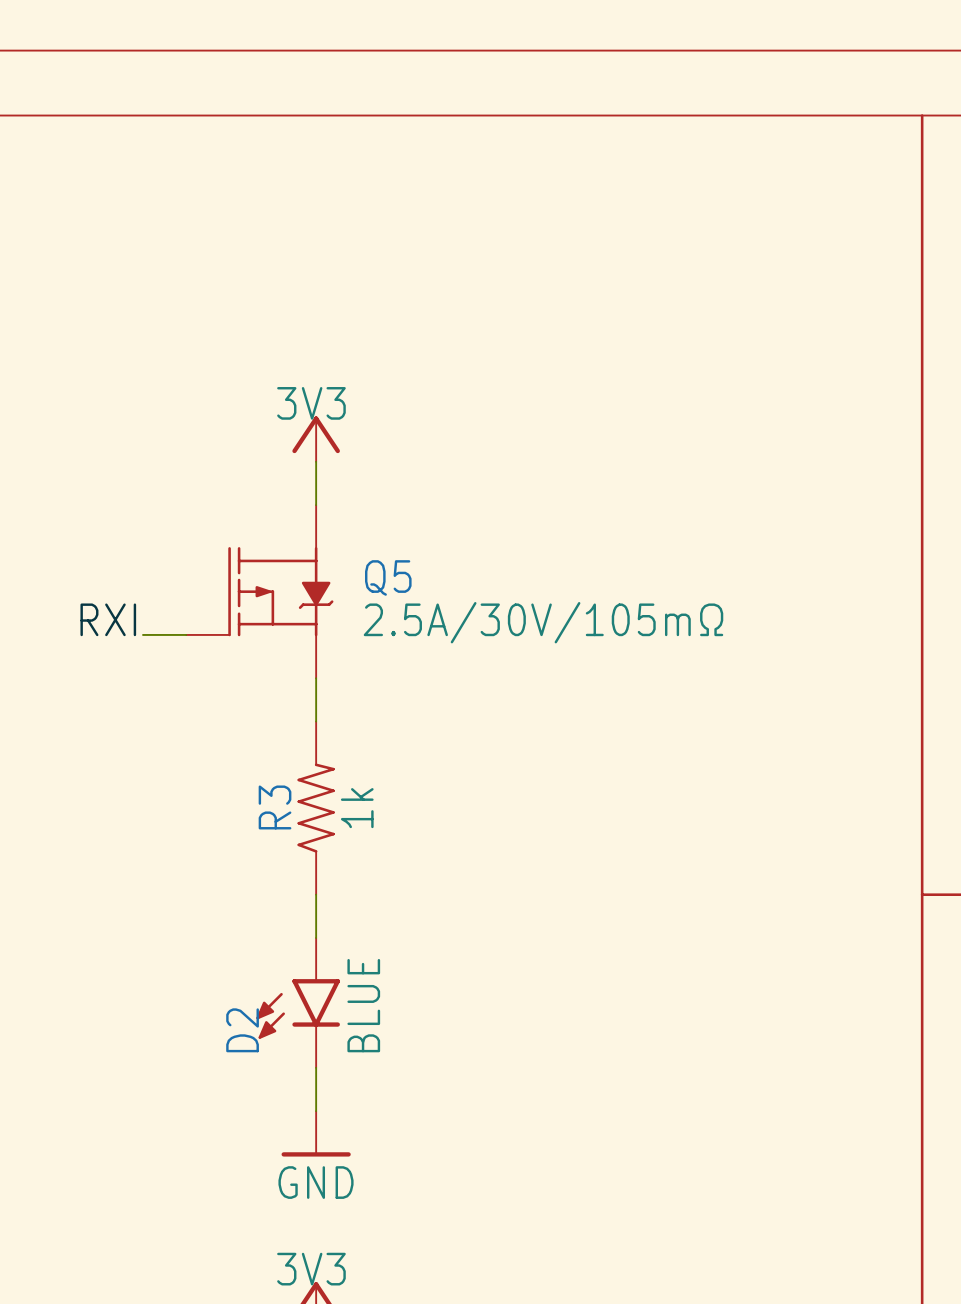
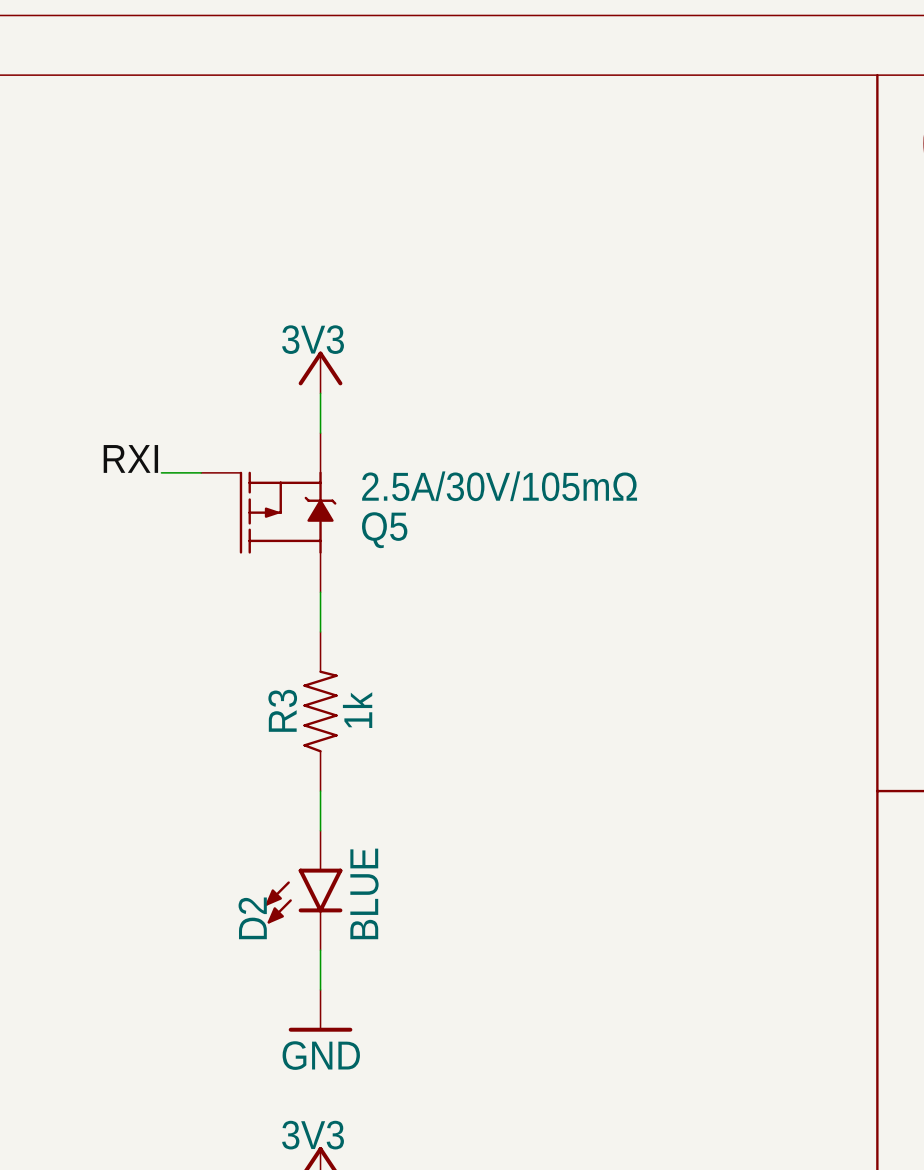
Q5 flip: as is (280, 591) -> up-down (288, 512)
label position: RXI (108, 619) -> RXI (130, 458)
wire: (142, 634) (186, 634) -> (161, 472) (201, 472)

